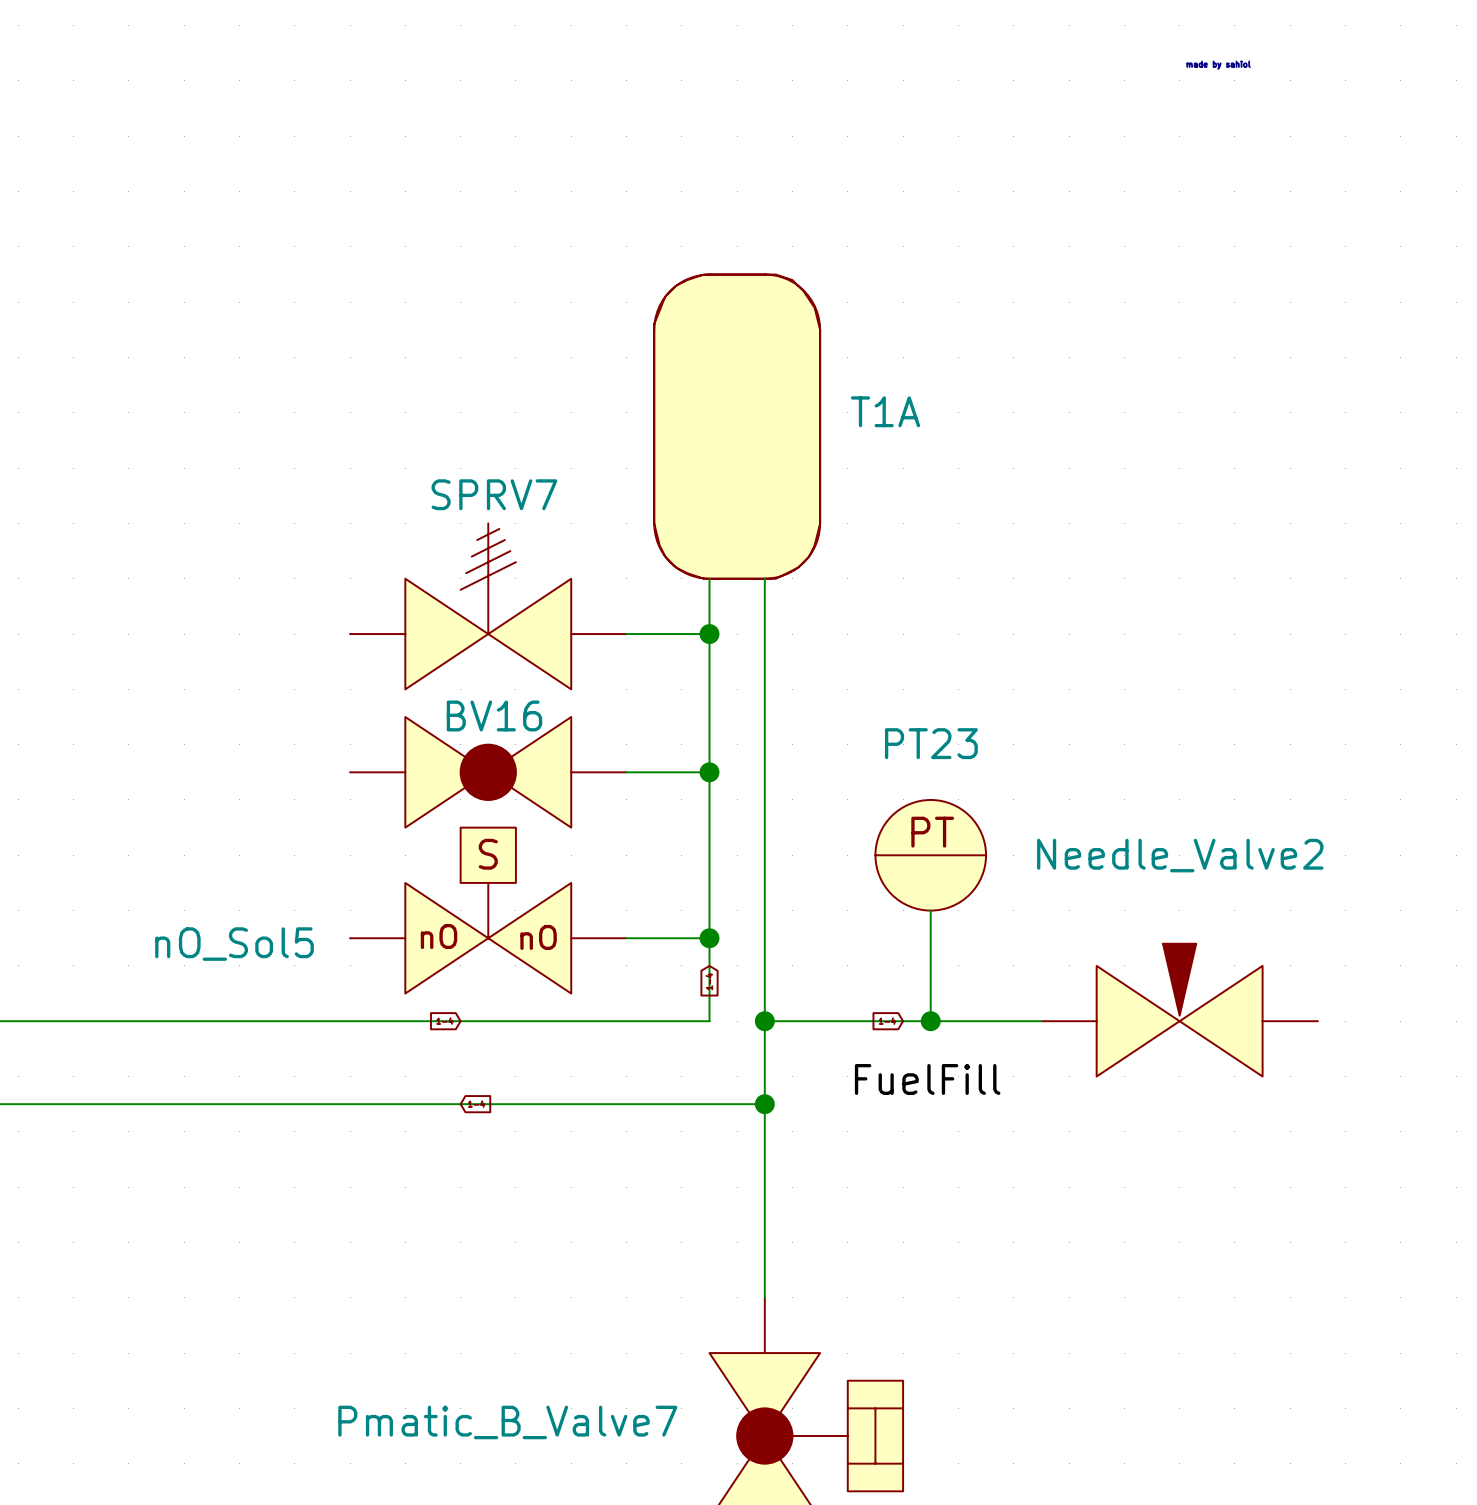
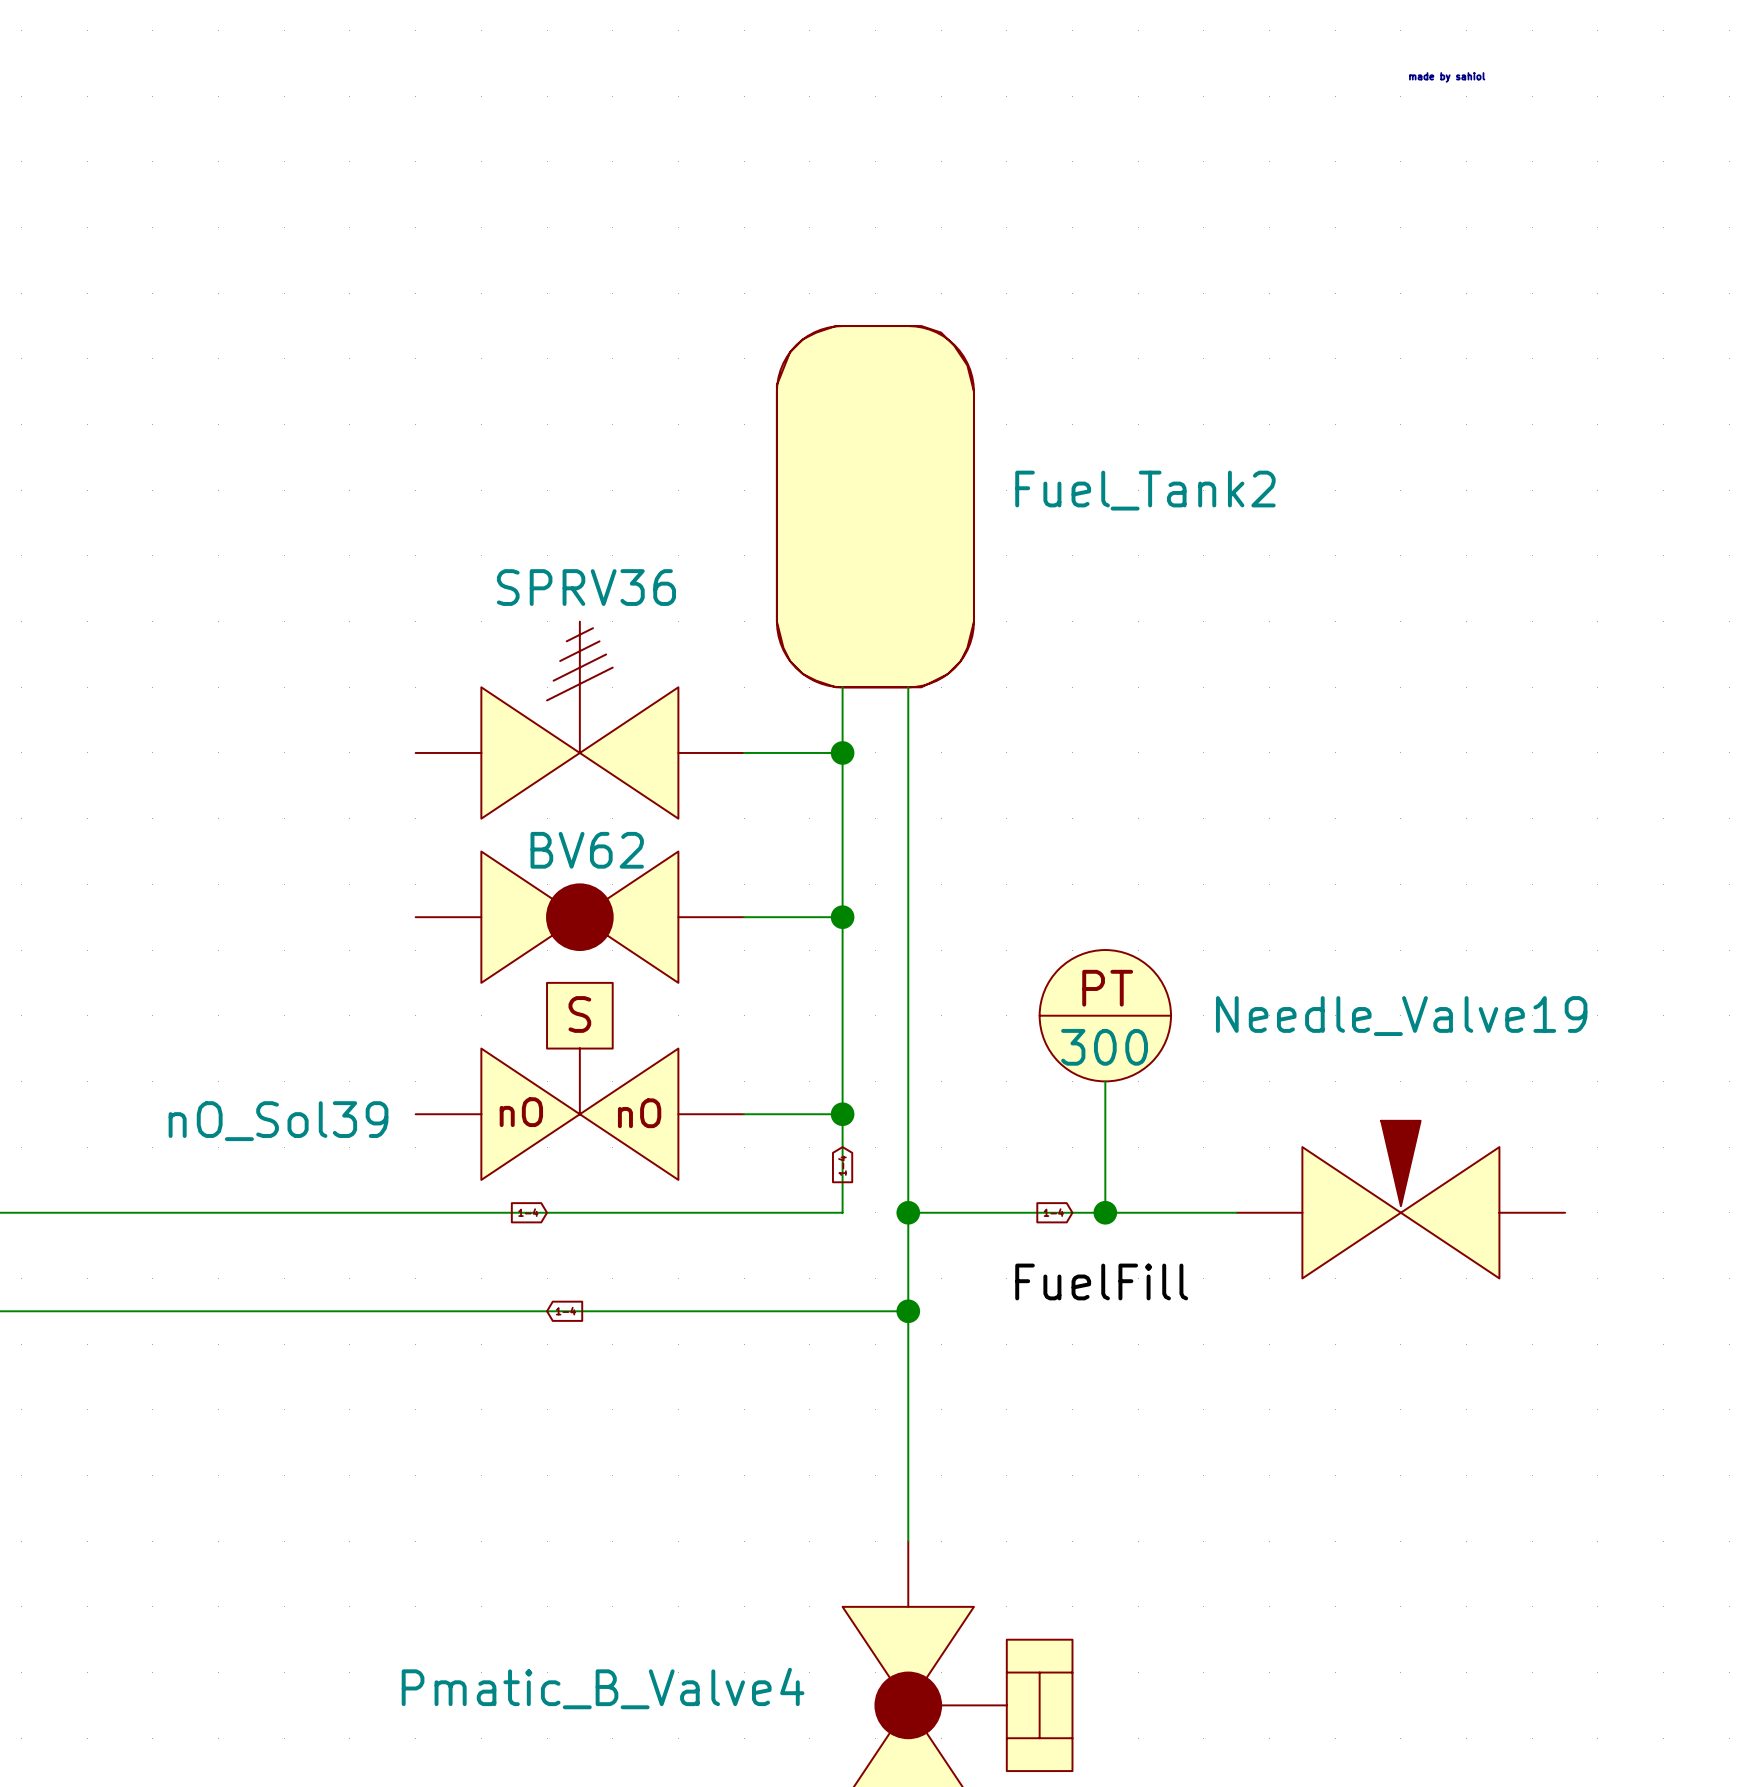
T1A: (737, 426) -> none
Fuel_Tank2: none -> (875, 506)
SPRV7 name: SPRV7 (494, 494) -> SPRV36 (586, 587)
BV16 name: BV16 (494, 715) -> BV62 (587, 850)
PT23 name: PT23 (931, 743) -> none
Needle_Valve2 name: Needle_Valve2 (1180, 855) -> Needle_Valve19 (1401, 1016)
PT23 value: none -> 300 (1104, 1047)
nO_Sol5 name: nO_Sol5 (234, 944) -> nO_Sol39 (278, 1121)
Pmatic_B_Valve7 name: Pmatic_B_Valve7 (507, 1422) -> Pmatic_B_Valve4 (603, 1688)

